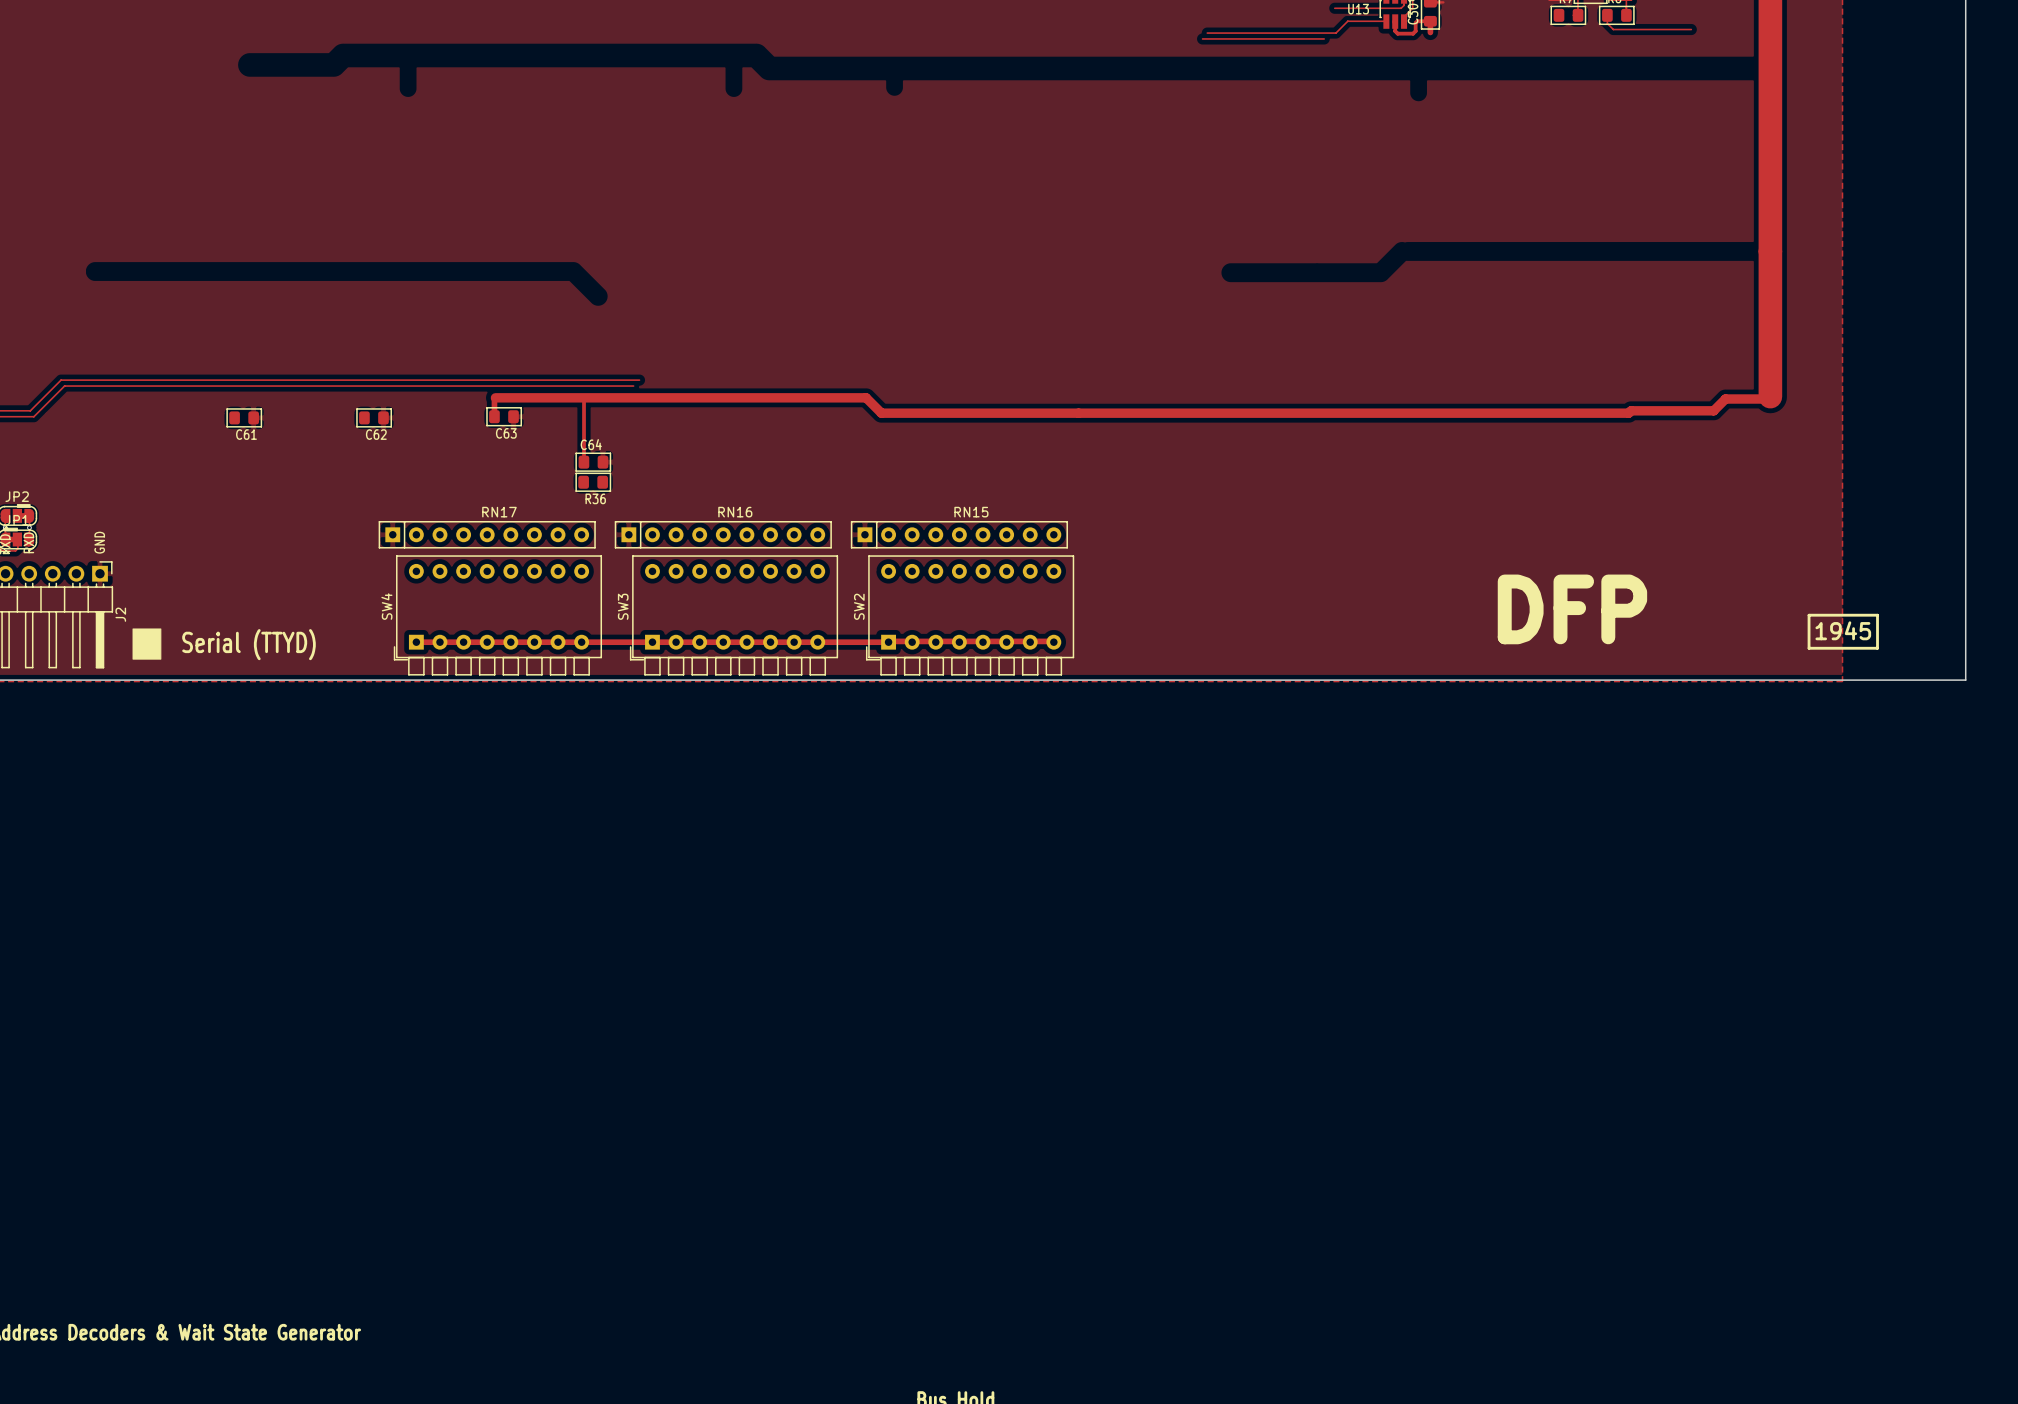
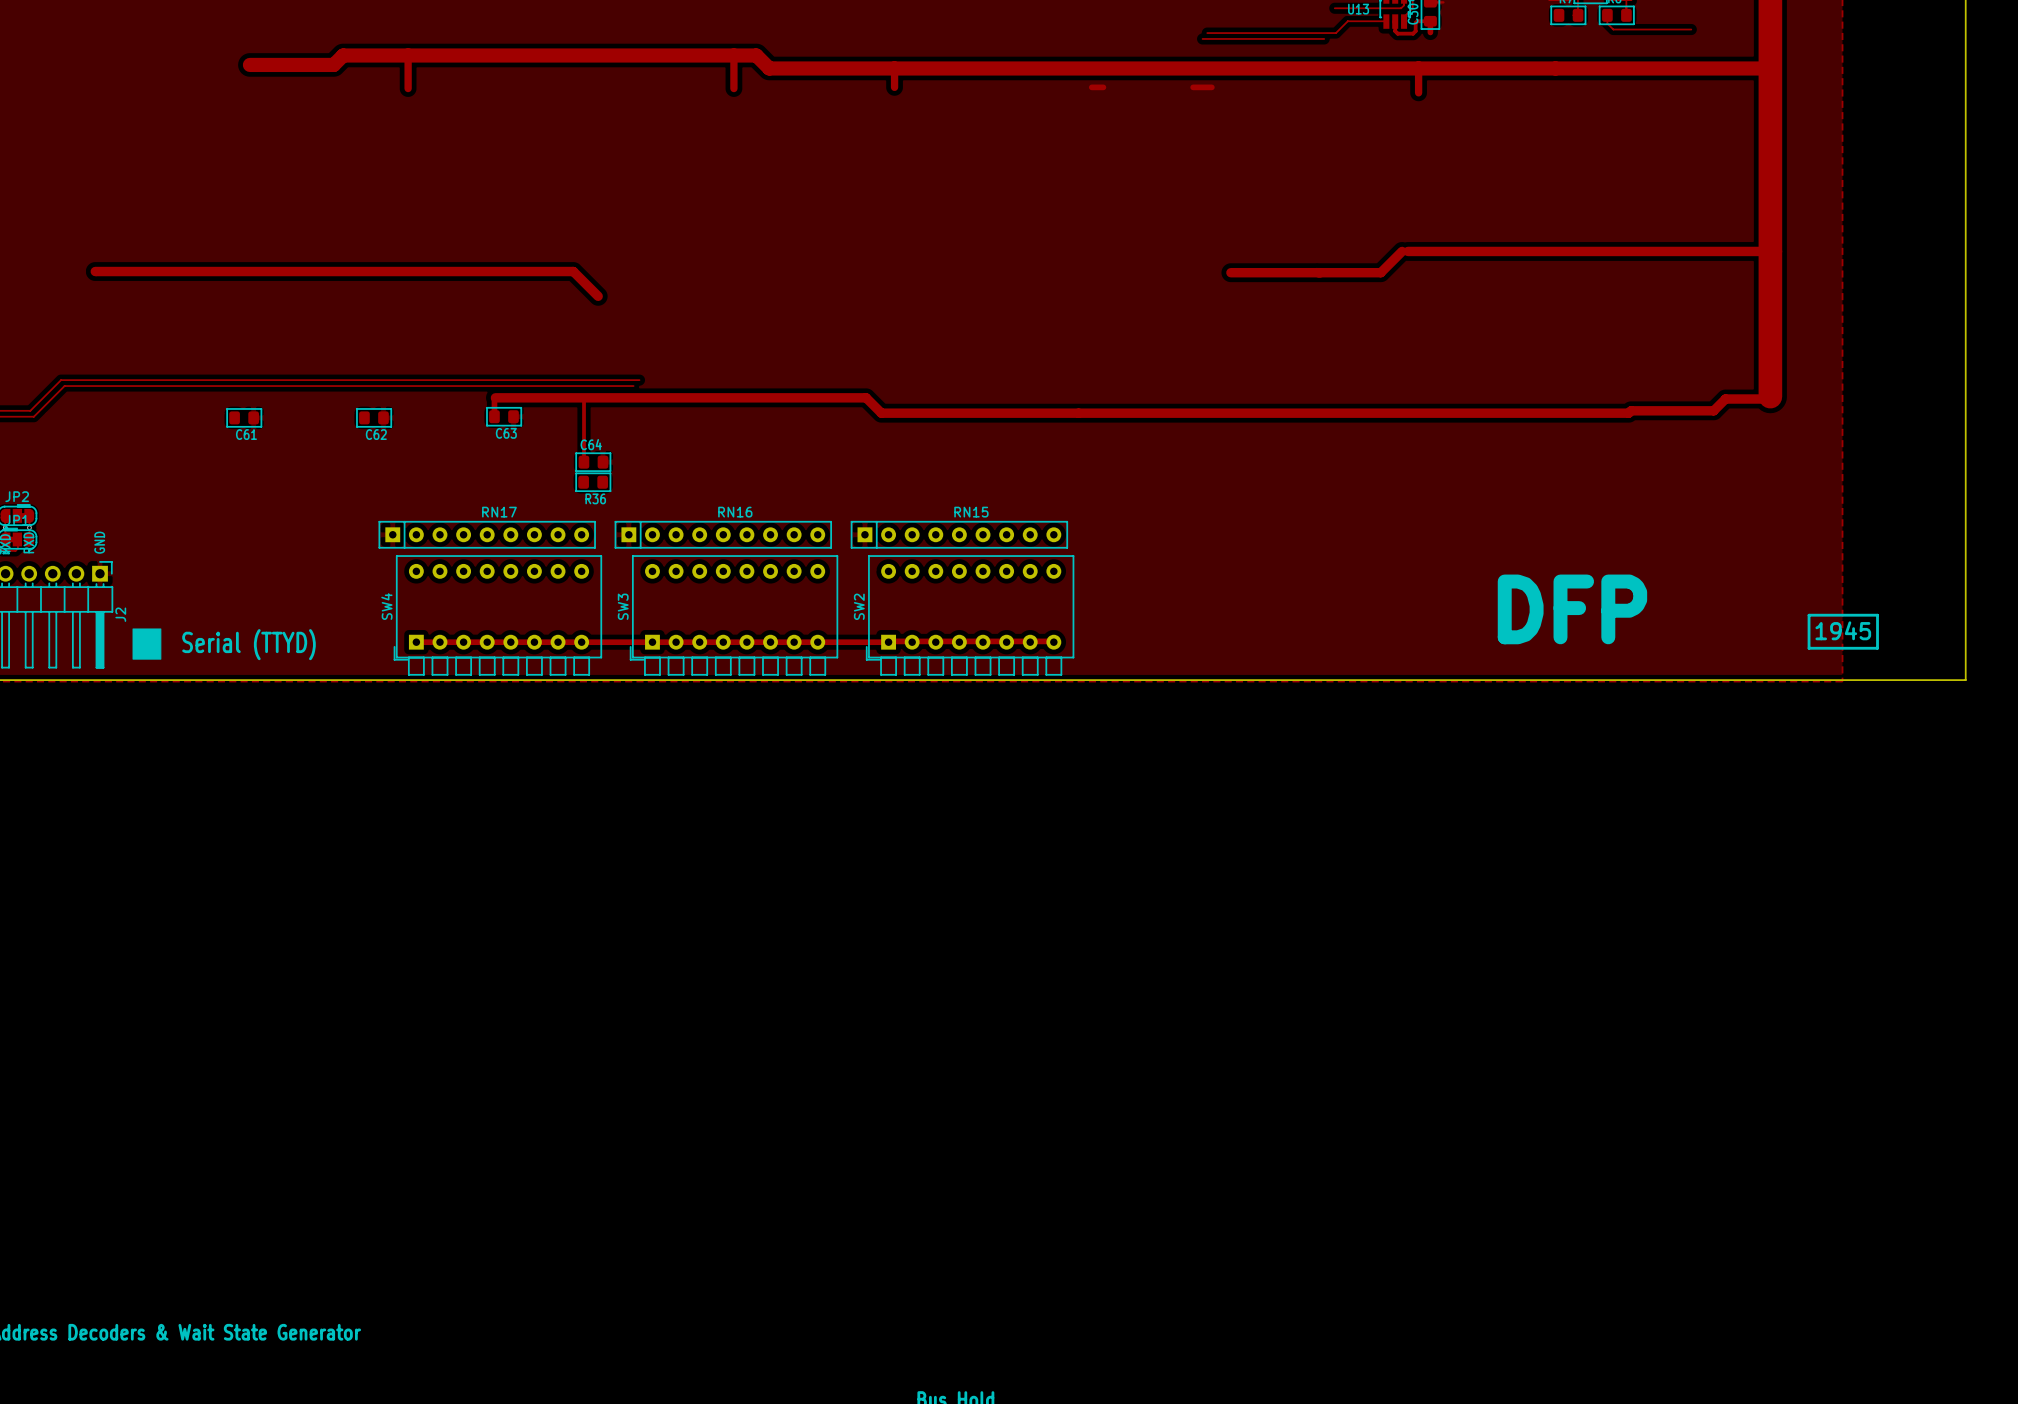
track: none -> (408, 55) (408, 88)
track: none -> (733, 55) (733, 88)
track: none -> (249, 64) (333, 64) (343, 55) (756, 55) (769, 68) (1769, 68)
track: none -> (894, 68) (894, 87)
track: none -> (1418, 68) (1418, 92)
track: none -> (1091, 87) (1103, 87)
track: none -> (1193, 87) (1211, 87)
track: none -> (1402, 251) (1380, 272) (1230, 272)
track: none -> (1407, 251) (1770, 251)
track: none -> (96, 272) (573, 271) (598, 296)

